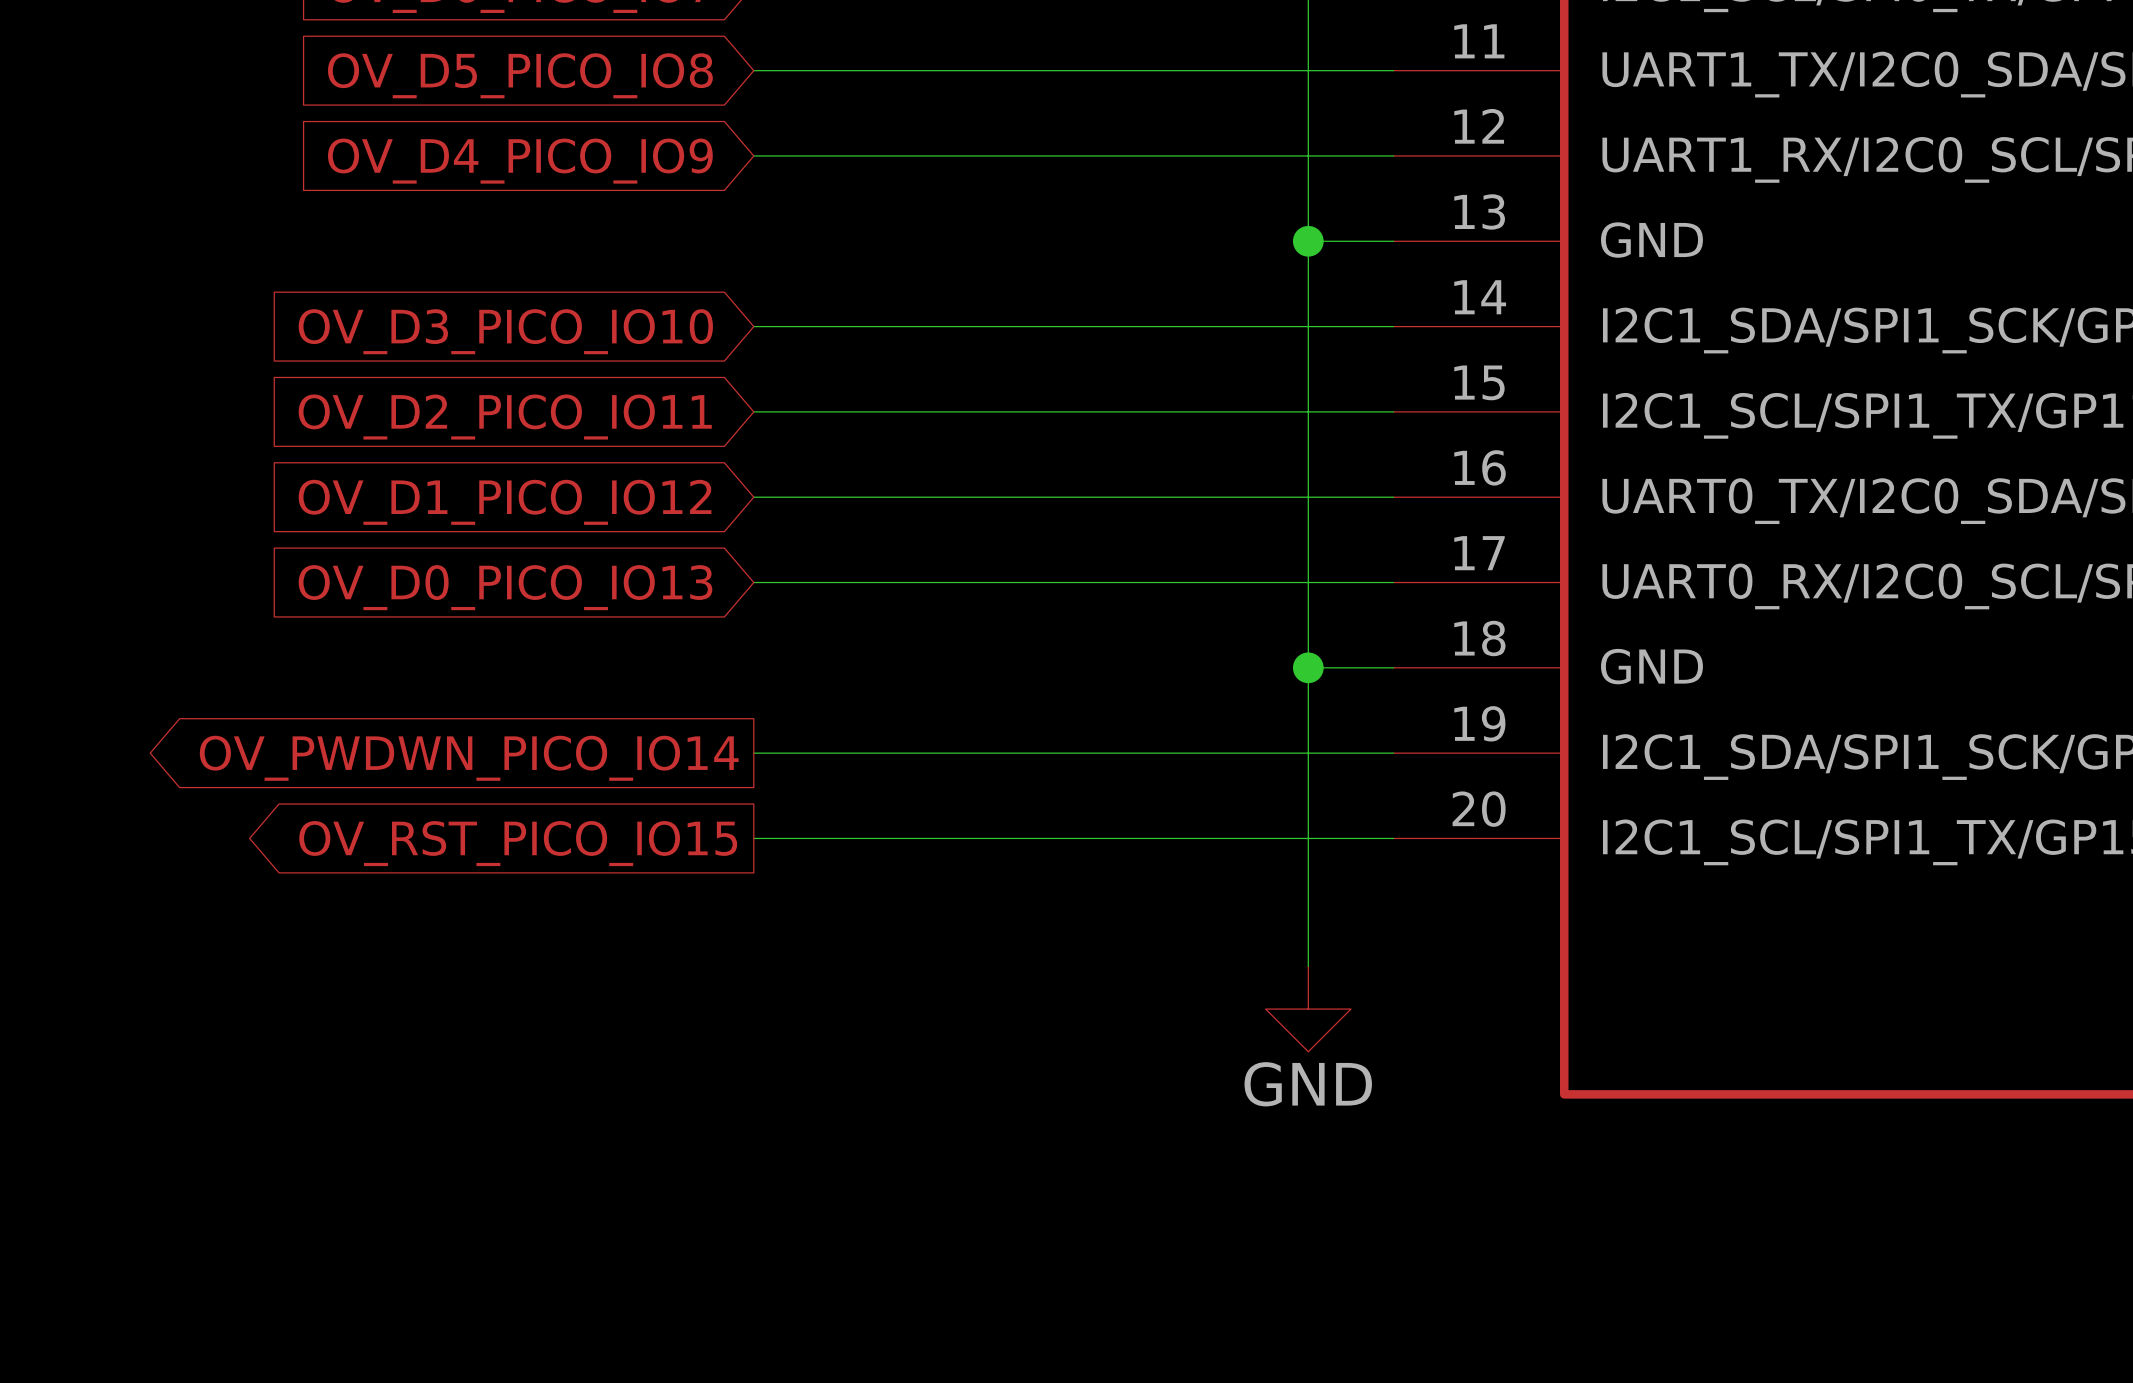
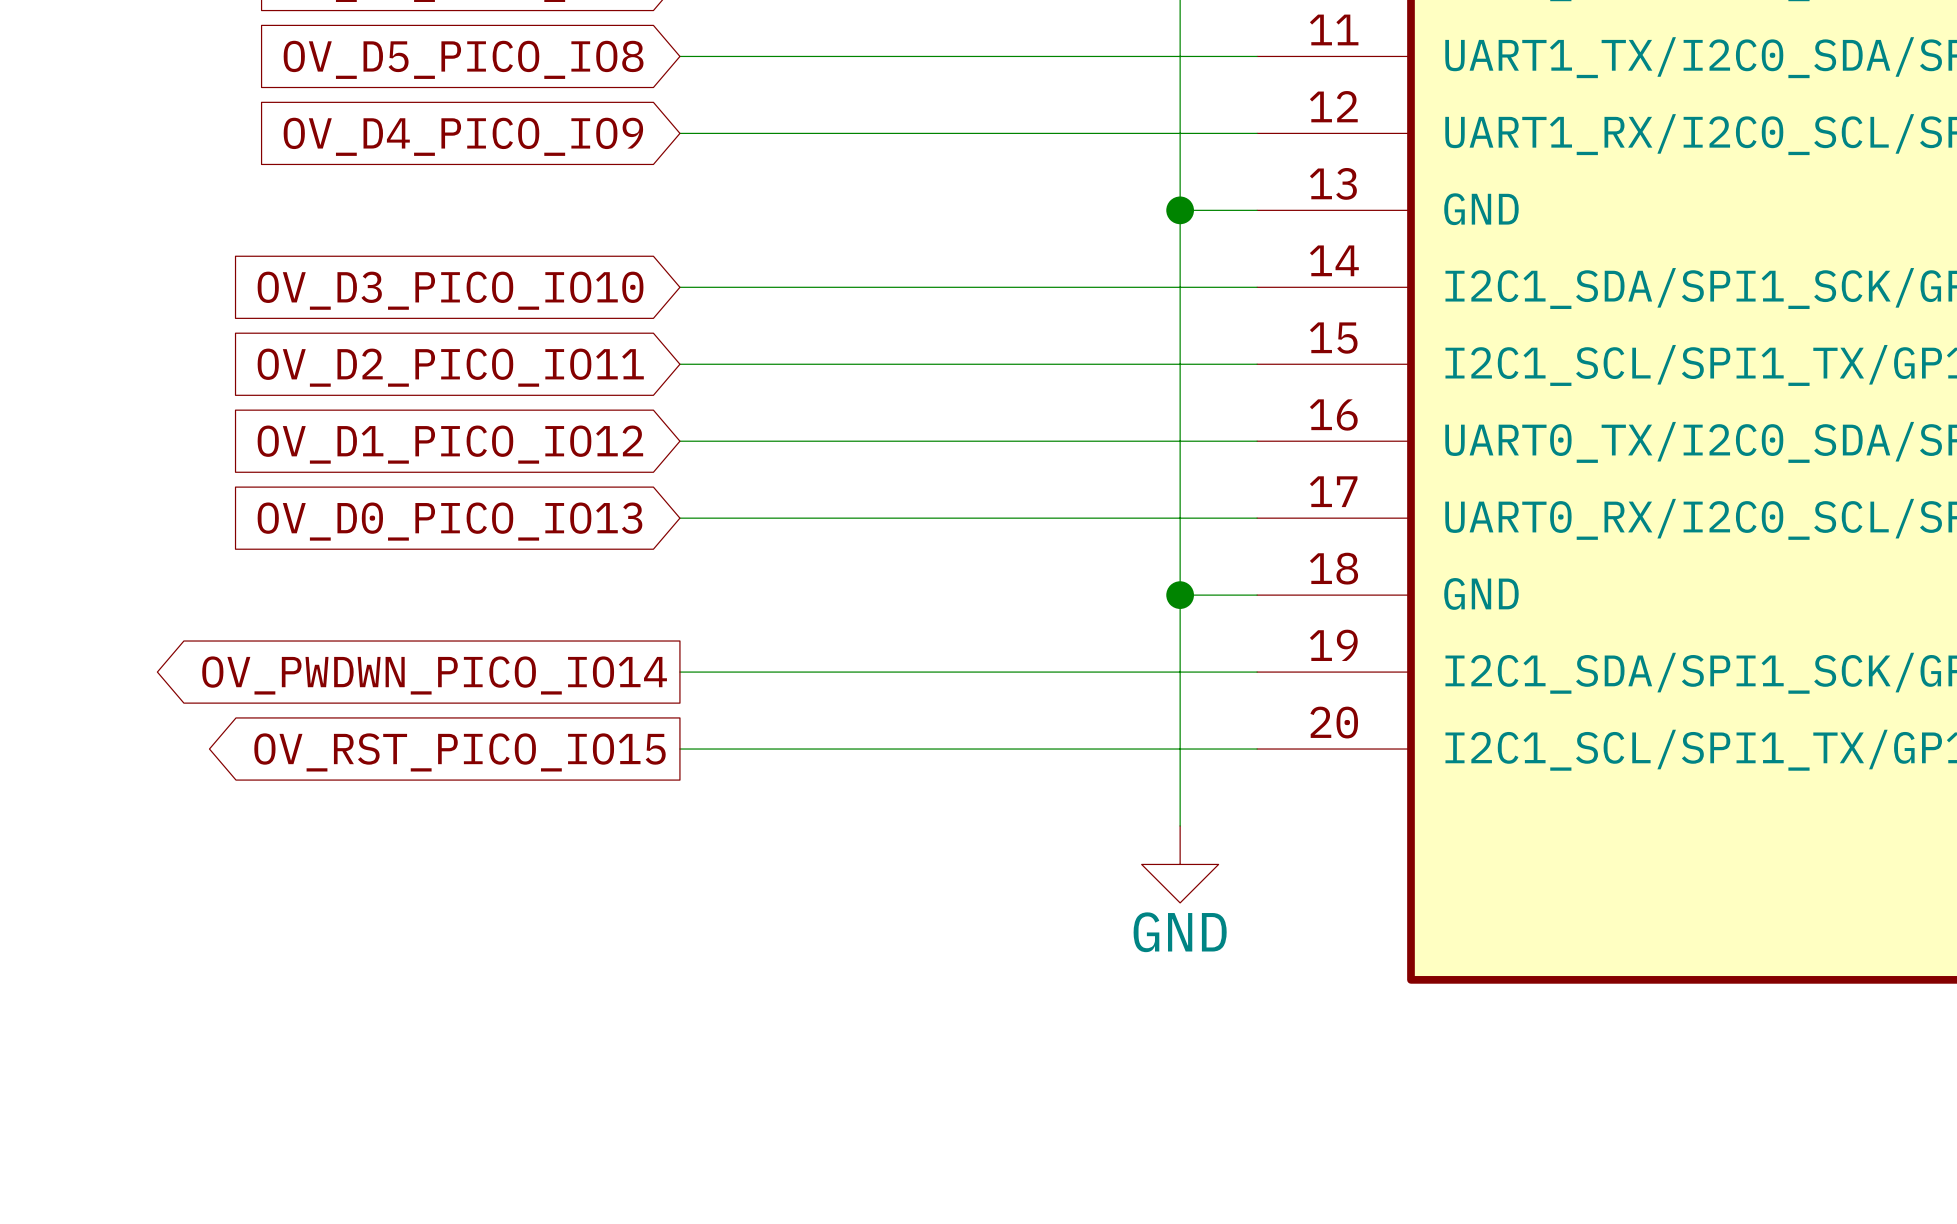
power symbol position: GND (1308, 1009) -> GND (1180, 864)

